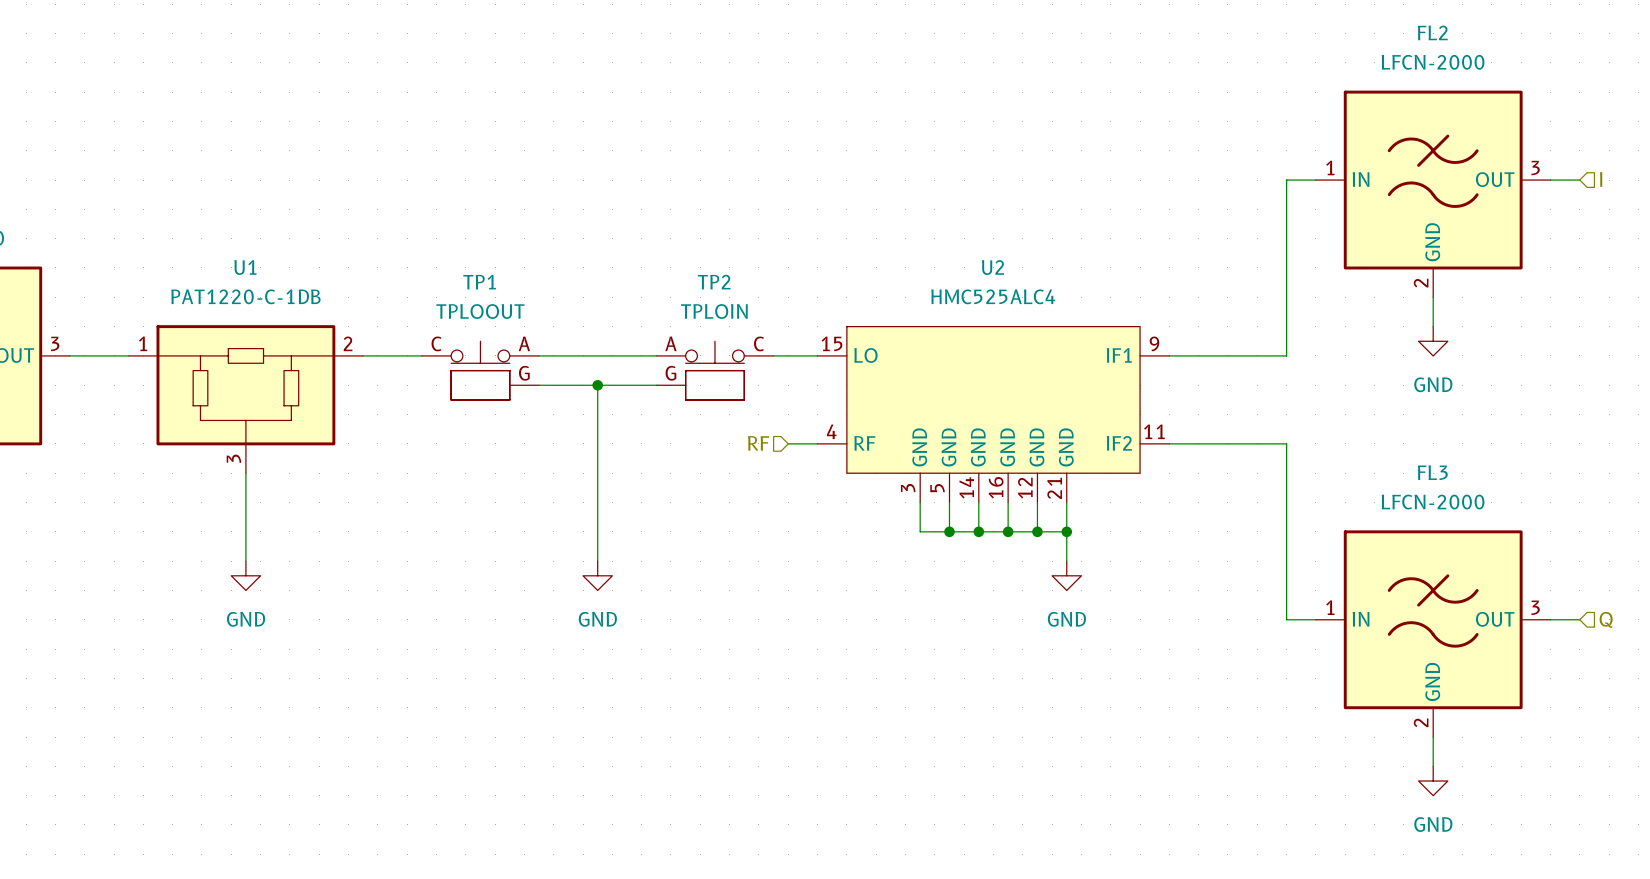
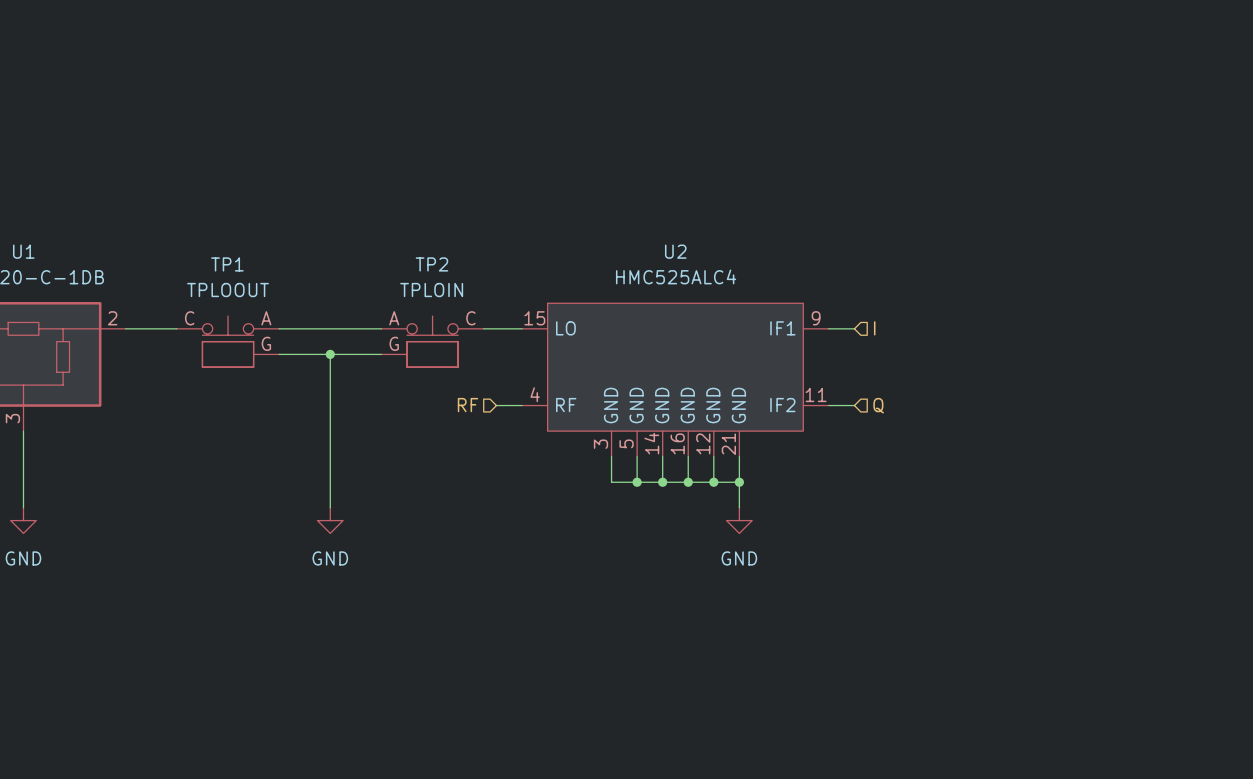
hierarchical label: I (1601, 179) -> none
wire: (1315, 180) (1286, 180) (1286, 355) (1198, 355) -> none
wire: (1550, 180) (1579, 180) -> none
FL2: LFCN-2000 (1433, 193) -> none
wire: (1433, 297) (1433, 326) -> none
power symbol: GND (1433, 341) -> none
hierarchical label: none -> I (874, 328)
wire: (1198, 443) (1286, 443) (1286, 619) (1315, 619) -> none
hierarchical label: none -> Q (878, 405)
wire: (1550, 619) (1579, 619) -> none
hierarchical label: Q (1606, 619) -> none
FL3: LFCN-2000 (1433, 633) -> none
wire: (1433, 737) (1433, 766) -> none
power symbol: GND (1433, 781) -> none

